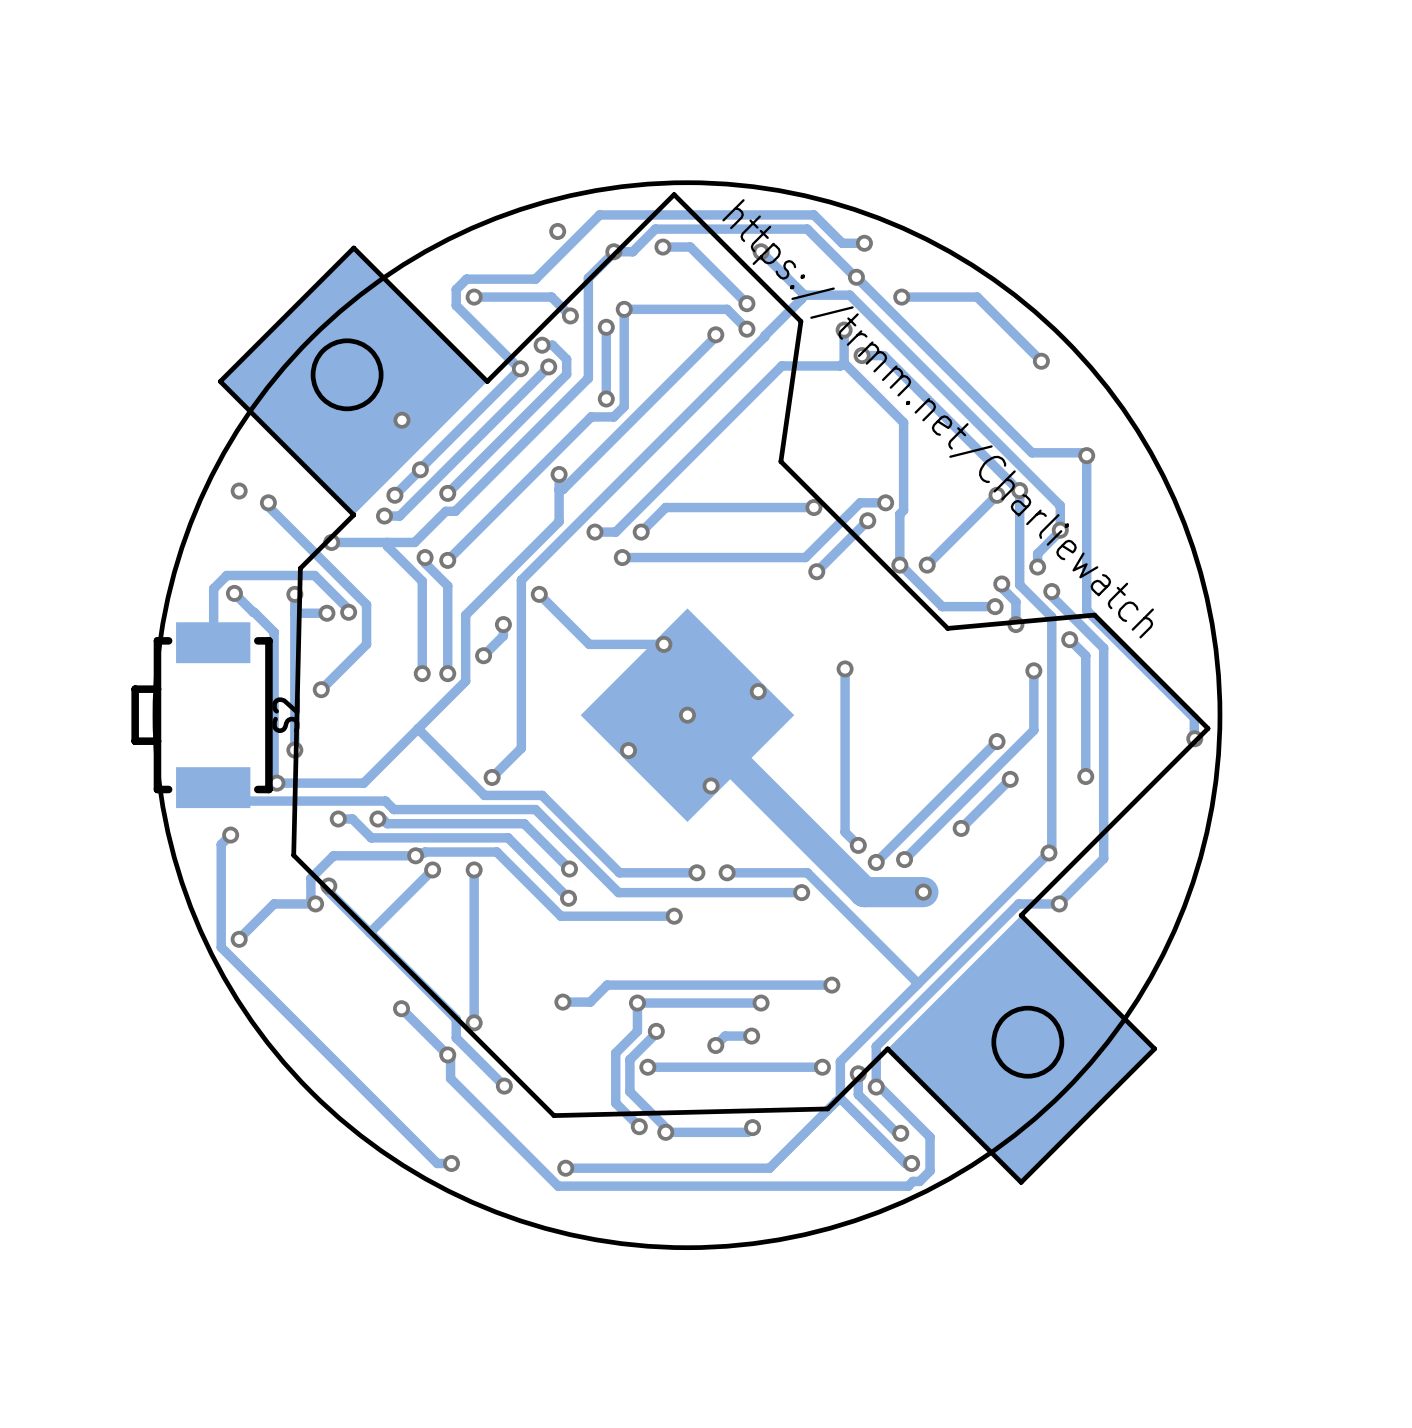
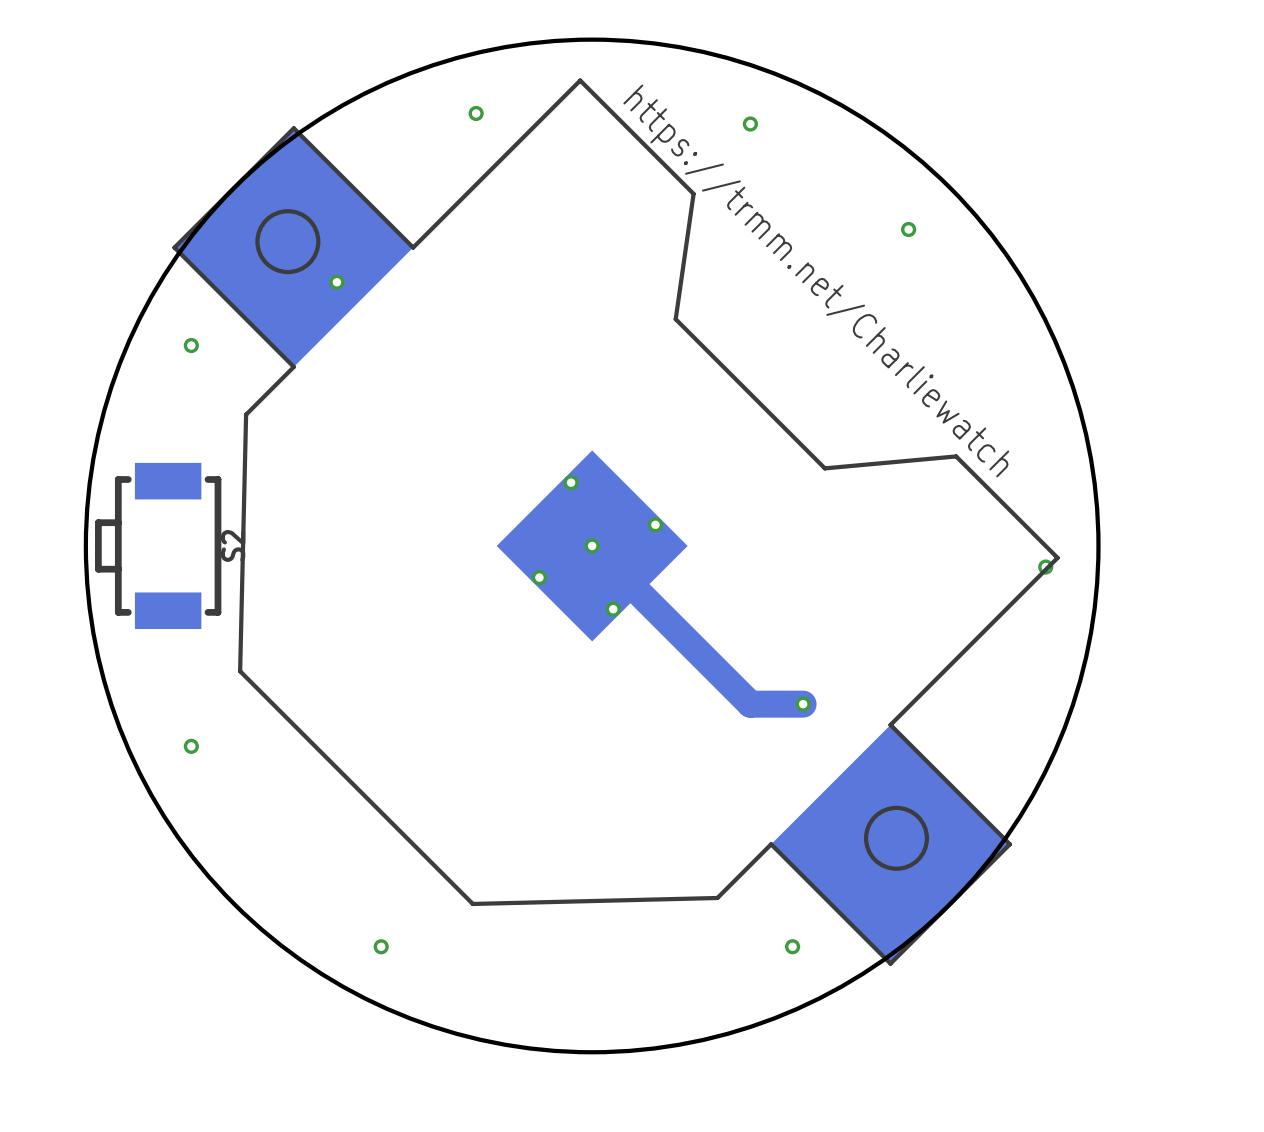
round board edge size: [152, 180, 1223, 1251] -> [83, 37, 1101, 1055]
track: (864, 243) (842, 243) (813, 214) (599, 214) (535, 279) (466, 279) (456, 289) (456, 305) (520, 368) (394, 495) -> none
track: (662, 247) (690, 247) (746, 303) -> none
via: (662, 247) -> none
via: (613, 251) -> none
track: (761, 251) (804, 295) -> none
via: (761, 251) -> none
via: (856, 277) -> none
track: (804, 295) (849, 295) (1060, 505) (1060, 530) (1037, 553) (1037, 567) -> none
track: (804, 295) (521, 580) (521, 748) (492, 777) -> none
track: (474, 297) (551, 297) (570, 315) -> none
via: (474, 297) -> none
track: (901, 297) (977, 297) (1041, 361) -> none
via: (901, 297) -> none
via: (746, 303) -> none
via: (624, 309) -> none
via: (570, 315) -> none
track: (606, 327) (606, 399) -> none
via: (606, 327) -> none
track: (746, 329) (727, 309) (624, 309) (624, 406) (613, 416) (591, 416) (447, 560) -> none
via: (746, 329) -> none
track: (844, 330) (844, 363) -> none
via: (844, 330) -> none
track: (715, 334) (562, 489) (559, 489) -> none
via: (715, 334) -> none
track: (542, 345) (552, 345) (566, 359) (566, 374) (447, 493) -> none
via: (542, 345) -> none
track: (862, 355) (883, 355) (1019, 490) (1019, 584) (1051, 617) (1051, 849) (840, 1061) (840, 1098) -> none
via: (862, 355) -> none
track: (844, 363) (903, 422) (903, 510) (899, 514) (899, 565) (942, 606) (995, 606) -> none
track: (844, 363) (840, 365) (781, 365) (615, 532) (594, 532) -> none
track: (548, 366) (399, 516) (384, 516) -> none
via: (548, 366) -> none
via: (520, 368) -> none
via: (606, 399) -> none
via: (1086, 455) -> none
via: (420, 469) -> none
track: (559, 474) (559, 521) (465, 615) (465, 681) (363, 783) (276, 783) (274, 779) (274, 632) (234, 593) -> none
via: (559, 474) -> none
via: (1019, 490) -> none
via: (447, 493) -> none
via: (394, 495) -> none
track: (997, 495) (927, 565) -> none
via: (997, 495) -> none
track: (268, 502) (268, 506) (366, 604) (366, 644) (321, 689) -> none
via: (268, 502) -> none
track: (885, 502) (860, 502) (805, 557) (622, 557) -> none
via: (885, 502) -> none
track: (813, 507) (665, 507) (641, 532) -> none
via: (813, 507) -> none
via: (384, 516) -> none
track: (867, 520) (816, 571) -> none
via: (867, 520) -> none
via: (1060, 530) -> none
via: (594, 532) -> none
via: (641, 532) -> none
track: (331, 542) (414, 542) (445, 511) (455, 511) (588, 378) (588, 278) (613, 251) (632, 251) (655, 229) (807, 229) (1031, 452) (1082, 452) (1086, 455) (1086, 610) (1194, 718) (1194, 738) -> none
via: (331, 542) -> none
track: (387, 542) (387, 546) (422, 581) (422, 673) -> none
track: (425, 557) (425, 563) (447, 585) (447, 673) -> none
via: (425, 557) -> none
via: (622, 557) -> none
via: (447, 560) -> none
via: (899, 565) -> none
via: (927, 565) -> none
via: (1037, 567) -> none
via: (816, 571) -> none
track: (1001, 583) (1001, 587) (1015, 601) (1015, 624) -> none
via: (1001, 583) -> none
track: (1051, 591) (1051, 596) (1103, 648) (1103, 858) (1059, 903) (1018, 903) (876, 1046) (876, 1087) (880, 1087) (930, 1137) (930, 1171) (919, 1181) (913, 1181) (908, 1186) (558, 1186) (450, 1078) (450, 1058) (401, 1008) -> none
via: (1051, 591) -> none
via: (234, 593) -> none
track: (294, 594) (294, 750) -> none
via: (294, 594) -> none
track: (539, 594) (589, 644) (663, 644) (687, 715) -> none
via: (539, 594) -> none
via: (995, 606) -> none
track: (348, 612) (348, 609) (314, 575) (226, 575) (213, 588) (213, 642) -> none
via: (348, 612) -> none
track: (326, 613) (294, 613) -> none
via: (326, 613) -> none
track: (503, 624) (503, 635) (483, 655) -> none
via: (503, 624) -> none
via: (1015, 624) -> none
track: (1069, 639) (1085, 655) (1085, 776) -> none
via: (1069, 639) -> none
via: (483, 655) -> none
track: (845, 668) (845, 832) (858, 845) -> none
via: (845, 668) -> none
track: (1033, 670) (1033, 730) (904, 859) -> none
via: (1033, 670) -> none
via: (422, 673) -> none
via: (447, 673) -> none
via: (321, 689) -> none
track: (418, 728) (484, 795) (542, 795) (619, 872) (696, 872) -> none
track: (997, 741) (876, 862) -> none
via: (997, 741) -> none
via: (294, 750) -> none
via: (1085, 776) -> none
via: (492, 777) -> none
track: (1010, 779) (961, 828) -> none
via: (1010, 779) -> none
via: (276, 783) -> none
track: (213, 787) (226, 801) (385, 801) (393, 809) (535, 809) (618, 892) (801, 892) -> none
track: (338, 819) (352, 819) (371, 837) (508, 837) (568, 898) -> none
via: (338, 819) -> none
track: (377, 819) (382, 819) (387, 823) (524, 823) (569, 869) -> none
via: (377, 819) -> none
via: (961, 828) -> none
track: (230, 835) (221, 844) (221, 947) (437, 1163) (451, 1163) -> none
via: (230, 835) -> none
via: (858, 845) -> none
via: (1048, 852) -> none
via: (415, 855) -> none
via: (904, 859) -> none
via: (876, 862) -> none
track: (432, 869) (369, 932) -> none
via: (432, 869) -> none
track: (474, 869) (474, 1022) -> none
via: (474, 869) -> none
via: (569, 869) -> none
via: (696, 872) -> none
track: (727, 872) (807, 872) (918, 983) -> none
via: (727, 872) -> none
track: (328, 886) (328, 891) (456, 1019) (456, 1037) (504, 1086) -> none
via: (328, 886) -> none
via: (801, 892) -> none
via: (568, 898) -> none
via: (315, 903) -> none
via: (1059, 903) -> none
track: (674, 916) (560, 916) (496, 852) (425, 852) (415, 855) (333, 855) (310, 878) (310, 900) (315, 903) (274, 903) (239, 938) -> none
via: (674, 916) -> none
track: (831, 985) (607, 985) (590, 1002) (562, 1002) -> none
via: (831, 985) -> none
via: (562, 1002) -> none
via: (637, 1003) -> none
track: (761, 1003) (637, 1003) (637, 1031) (615, 1053) (615, 1103) (639, 1126) -> none
via: (761, 1003) -> none
via: (401, 1008) -> none
via: (474, 1022) -> none
track: (656, 1031) (629, 1059) (629, 1091) (666, 1128) (665, 1132) (747, 1132) (752, 1127) -> none
via: (656, 1031) -> none
track: (751, 1036) (725, 1036) (715, 1045) -> none
via: (751, 1036) -> none
via: (715, 1045) -> none
via: (447, 1054) -> none
via: (647, 1067) -> none
track: (822, 1067) (647, 1067) -> none
via: (822, 1067) -> none
track: (858, 1073) (858, 1094) (896, 1133) (900, 1133) -> none
via: (858, 1073) -> none
via: (504, 1086) -> none
via: (876, 1087) -> none
track: (840, 1098) (905, 1163) (911, 1163) -> none
track: (840, 1098) (769, 1168) (565, 1168) -> none
via: (639, 1126) -> none
via: (752, 1127) -> none
via: (665, 1132) -> none
via: (900, 1133) -> none
via: (565, 1168) -> none

